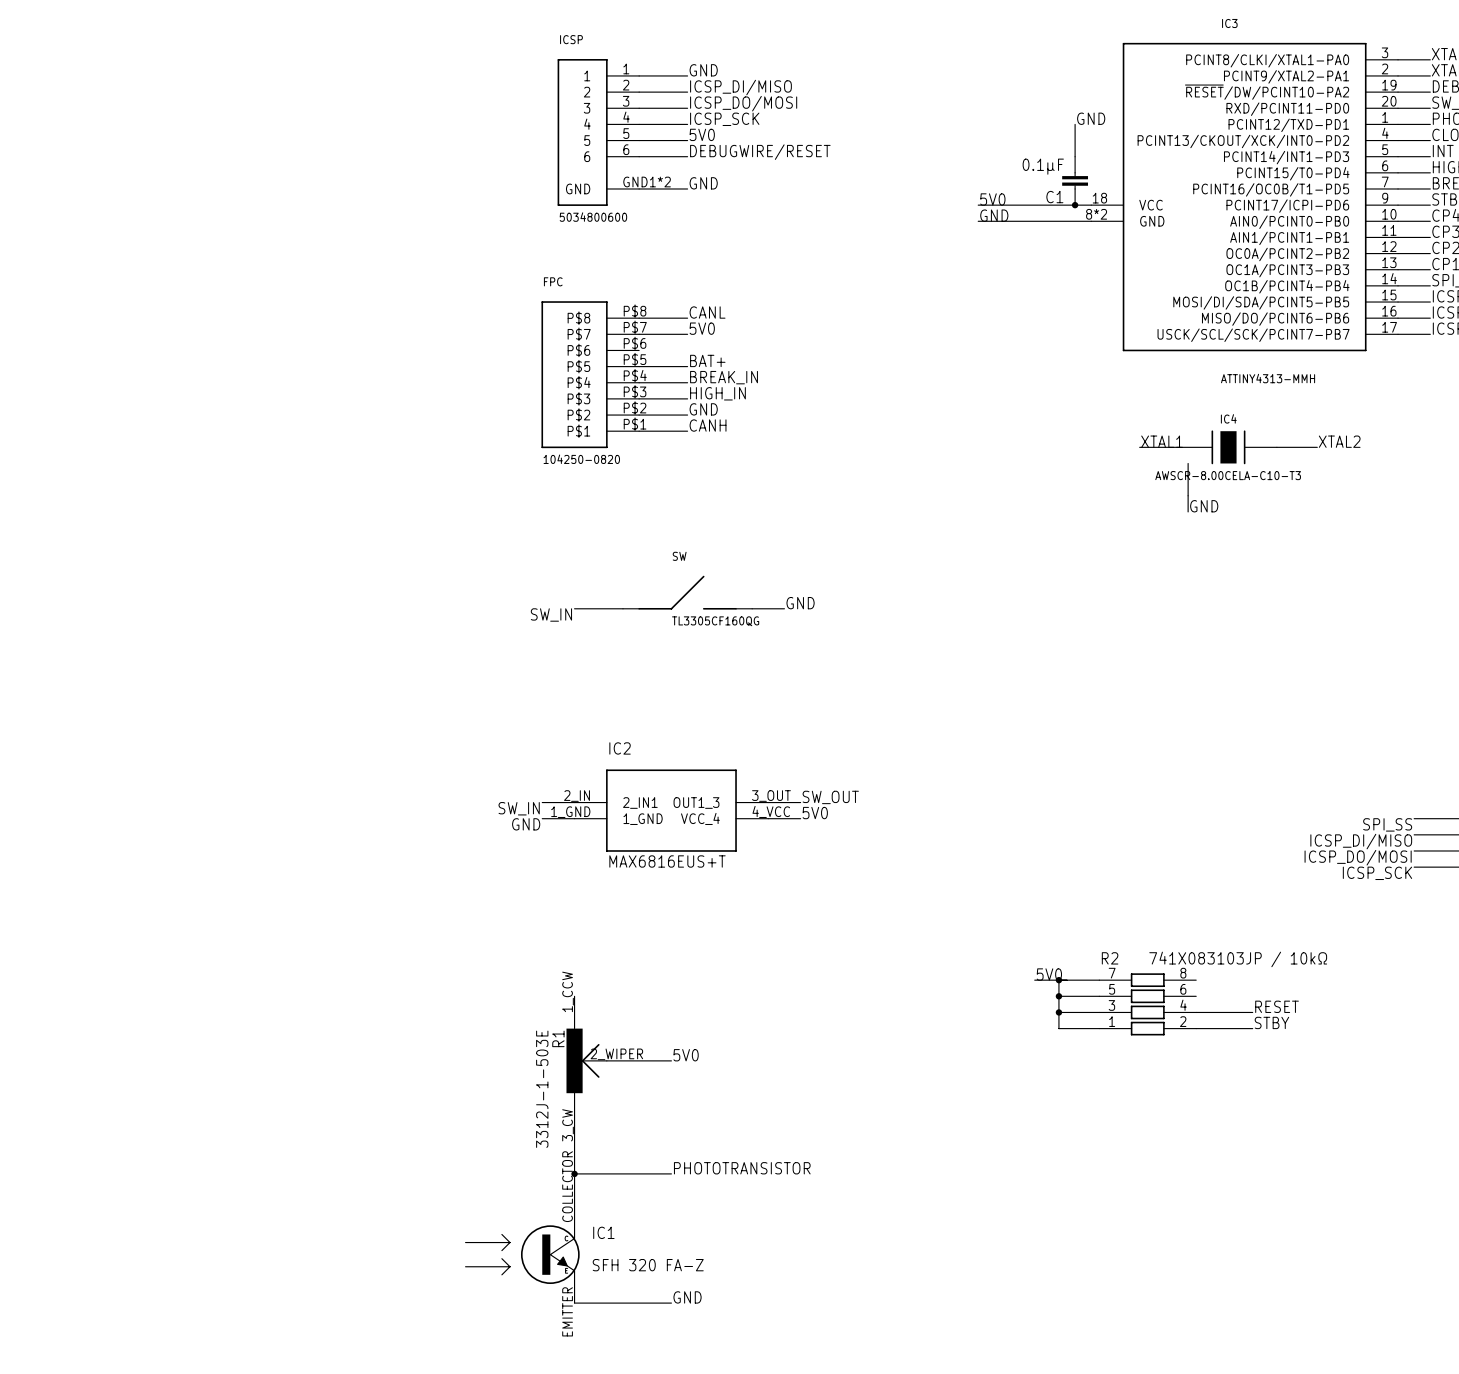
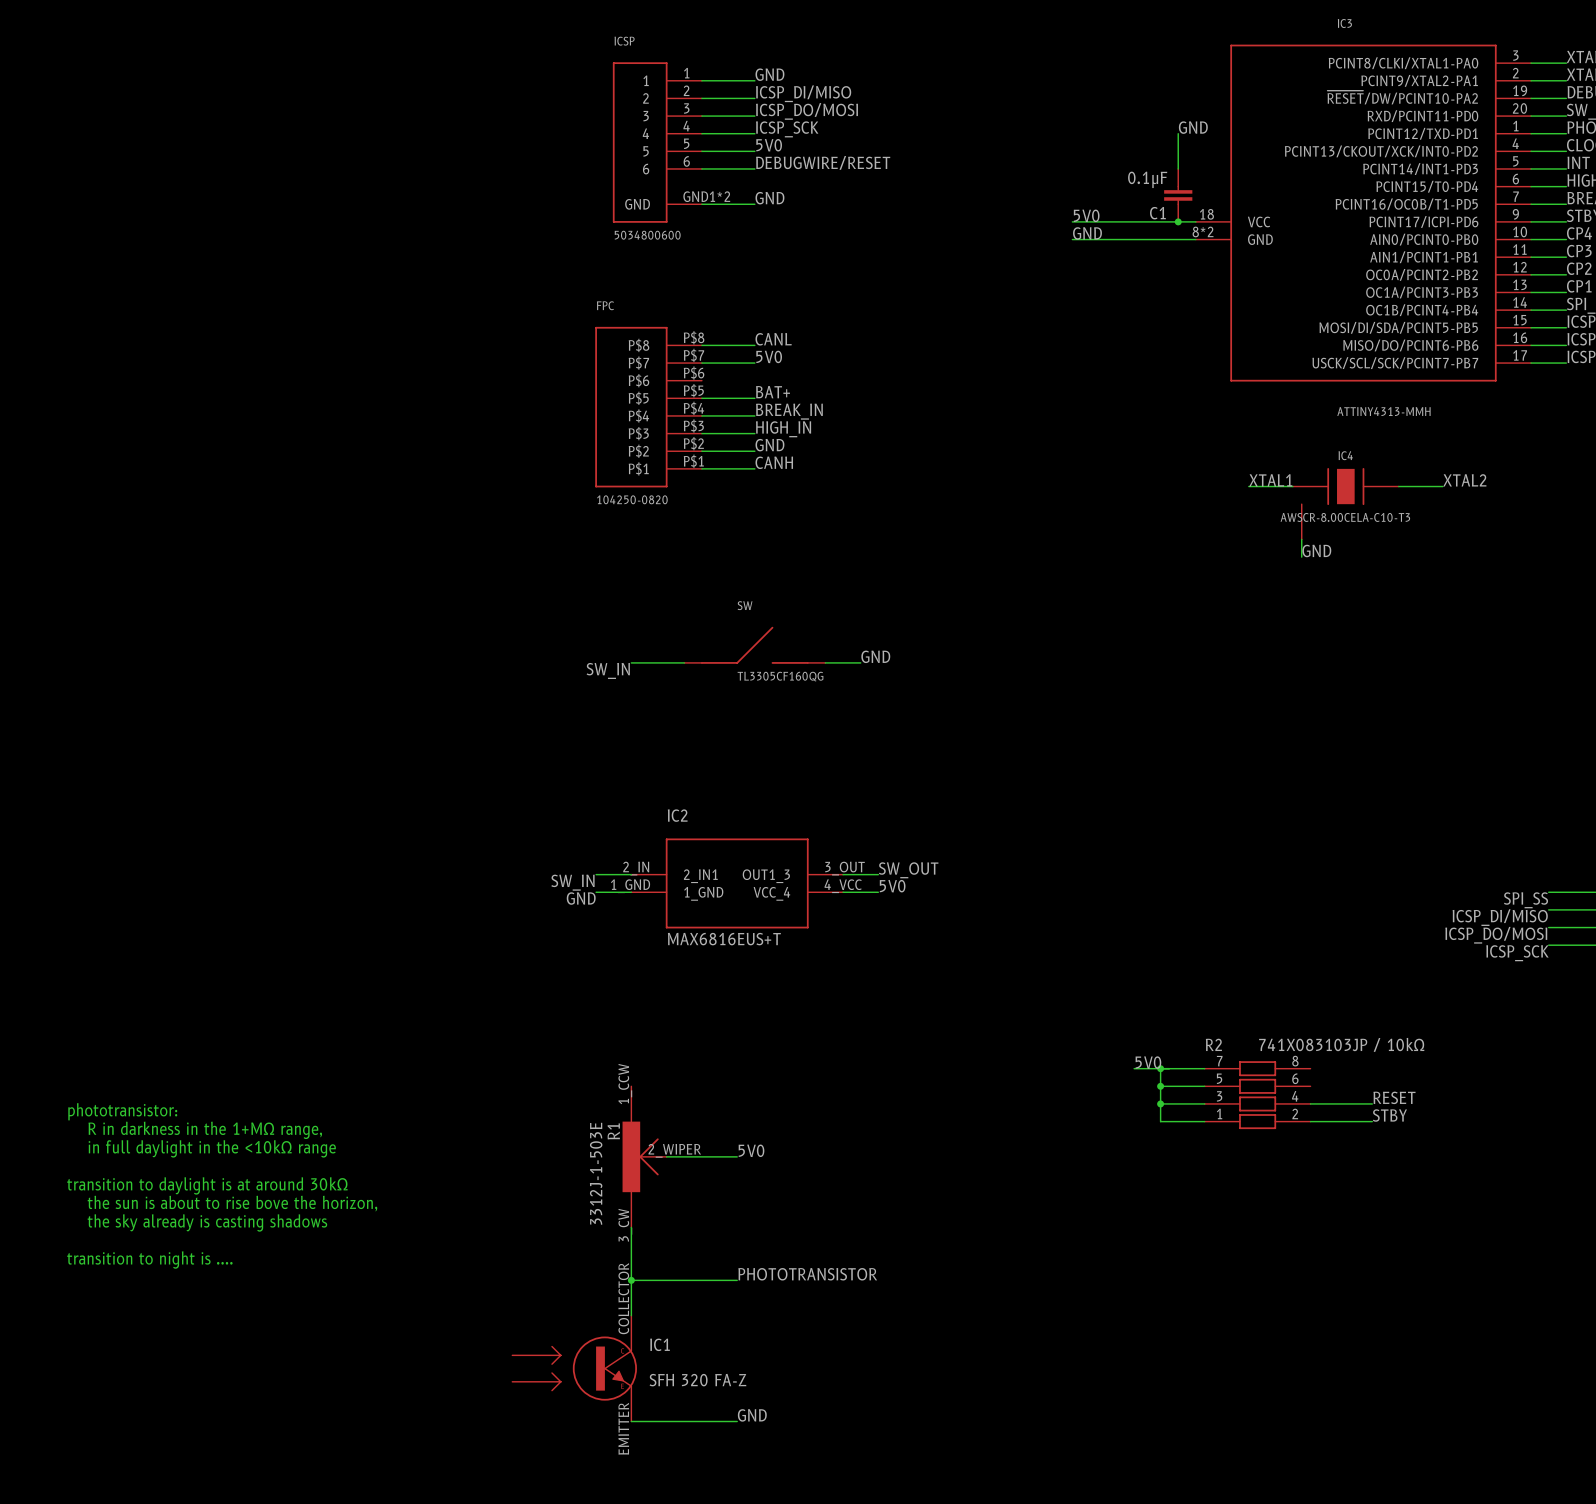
text: none -> phototransistor: (122, 1111)
text: none -> R in darkness in the 1+MΩ range, (205, 1130)
text: none -> in full daylight in the <10kΩ range (212, 1148)
text: none -> transition to daylight is at around 30kΩ (207, 1185)
text: none -> the sun is about to rise bove the horizon, (232, 1203)
text: none -> the sky already is casting shadows (207, 1222)
text: none -> transition to night is .... (149, 1260)

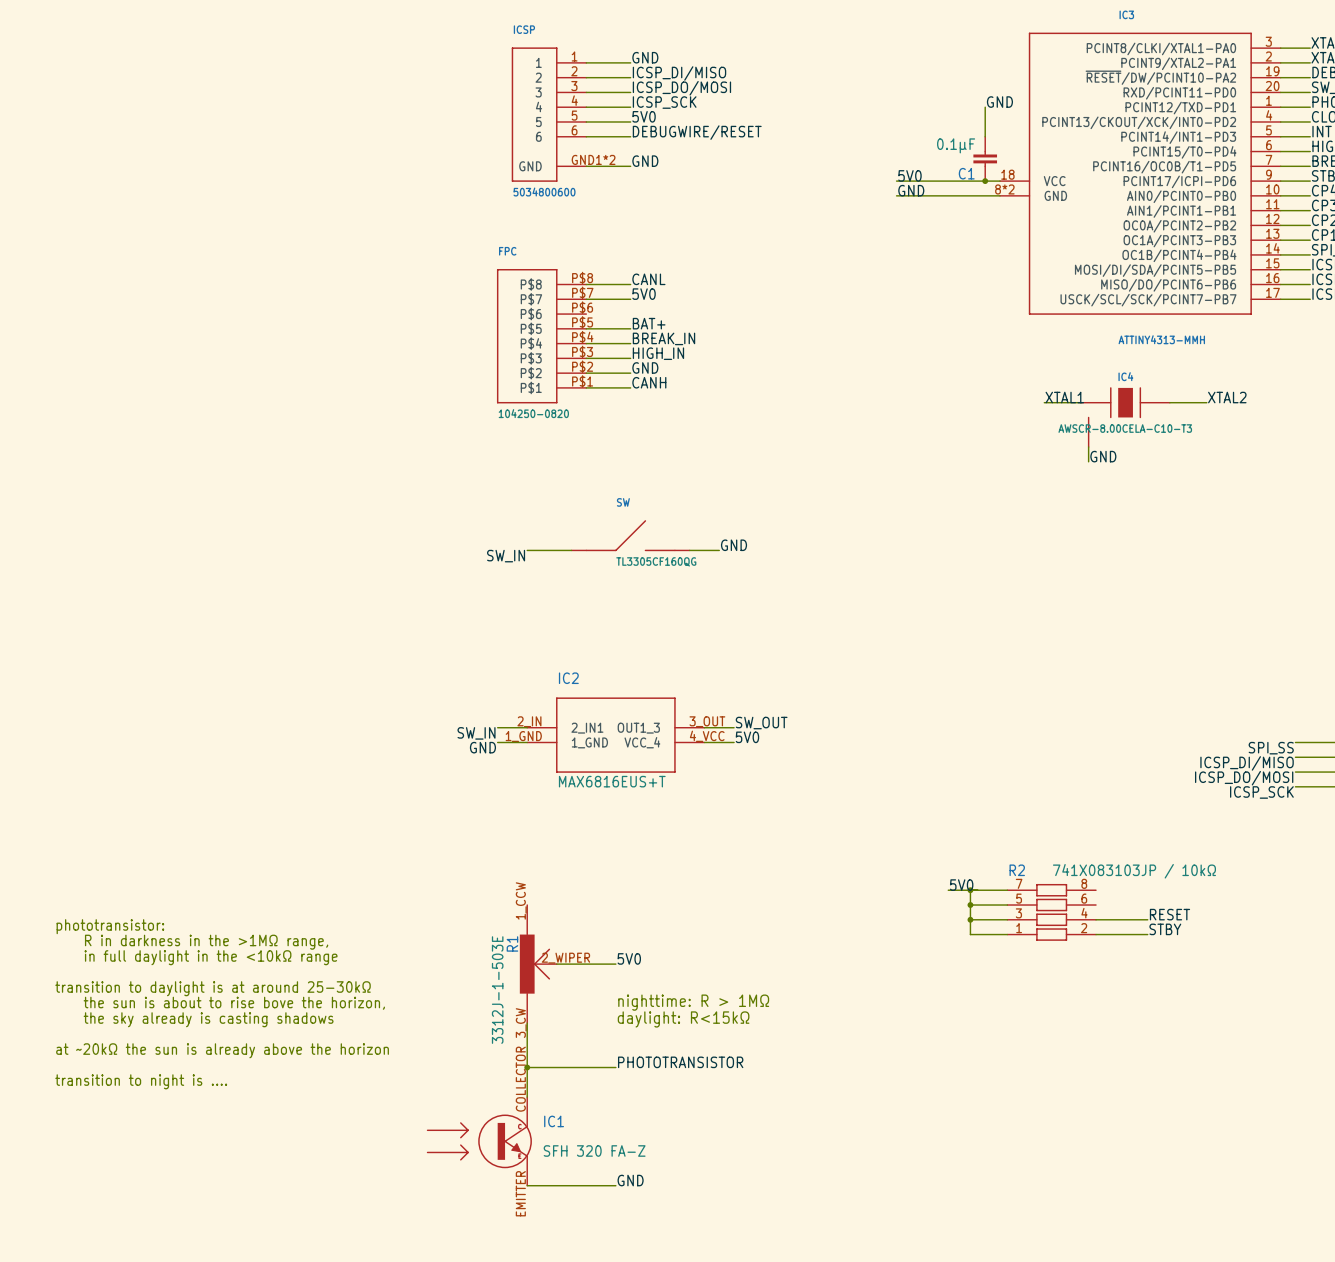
text: R in darkness in the 1+MΩ range, (205, 1130) -> R in darkness in the >1MΩ range, (206, 942)
text: transition to daylight is at around 30kΩ (207, 1185) -> transition to daylight is at around 25-30kΩ (213, 988)
text: none -> nighttime: R > 1MΩ (693, 1002)
text: none -> daylight: R<15kΩ (683, 1019)
text: transition to night is .... (149, 1260) -> at ~20kΩ the sun is already above the horizon (222, 1050)
text: none -> transition to night is .... (141, 1081)

